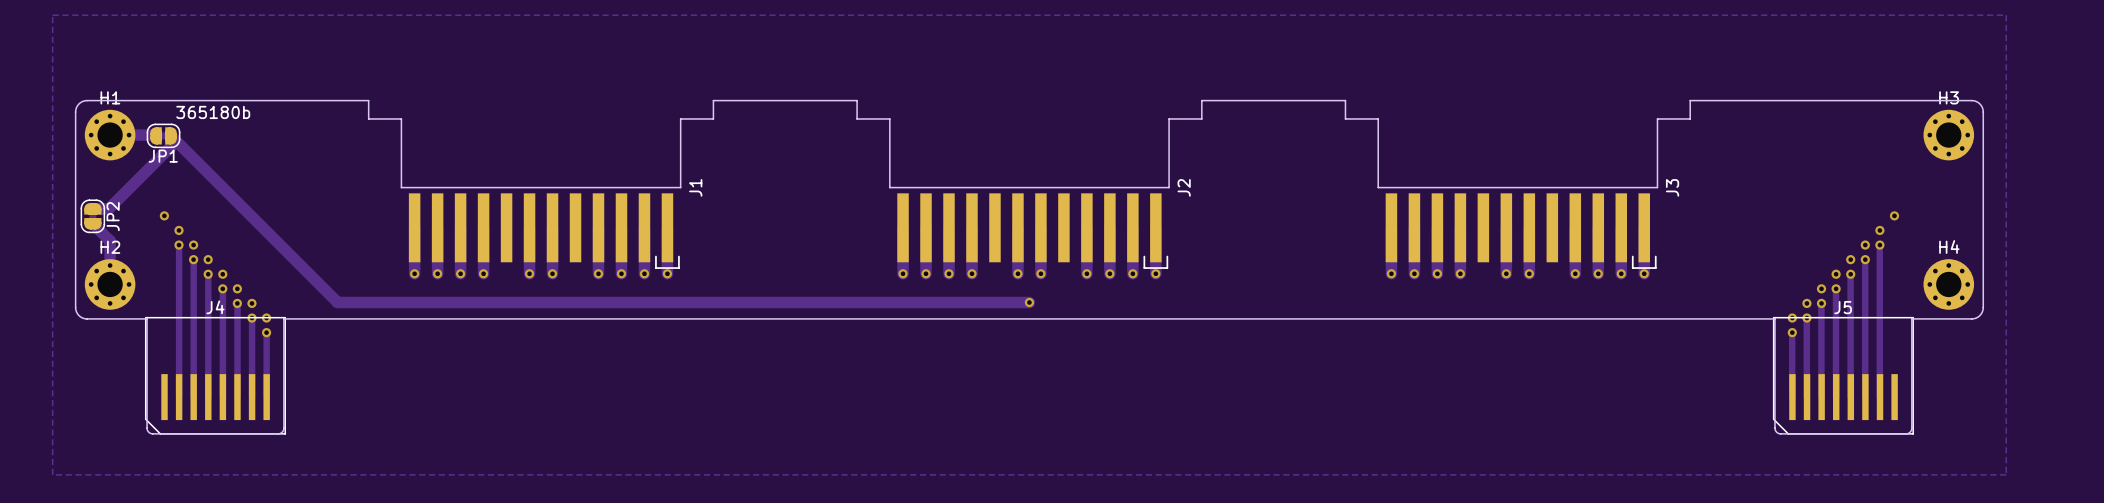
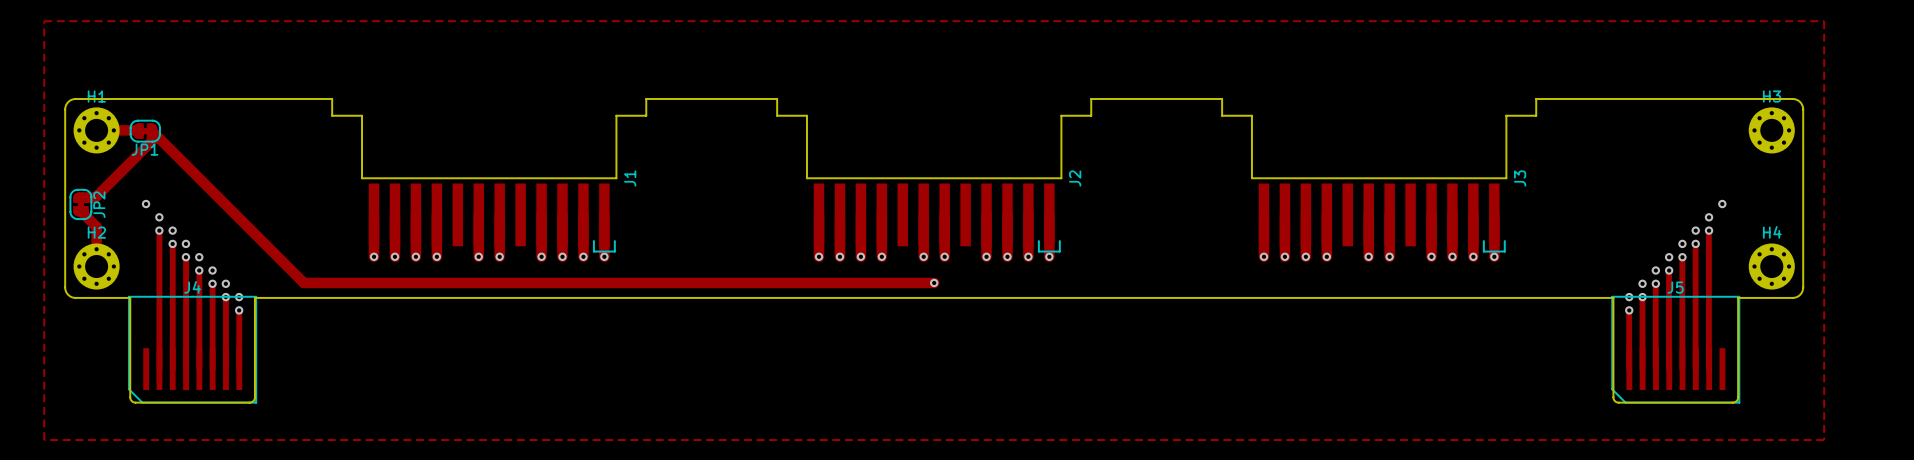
text: 365180b (213, 112) -> none

